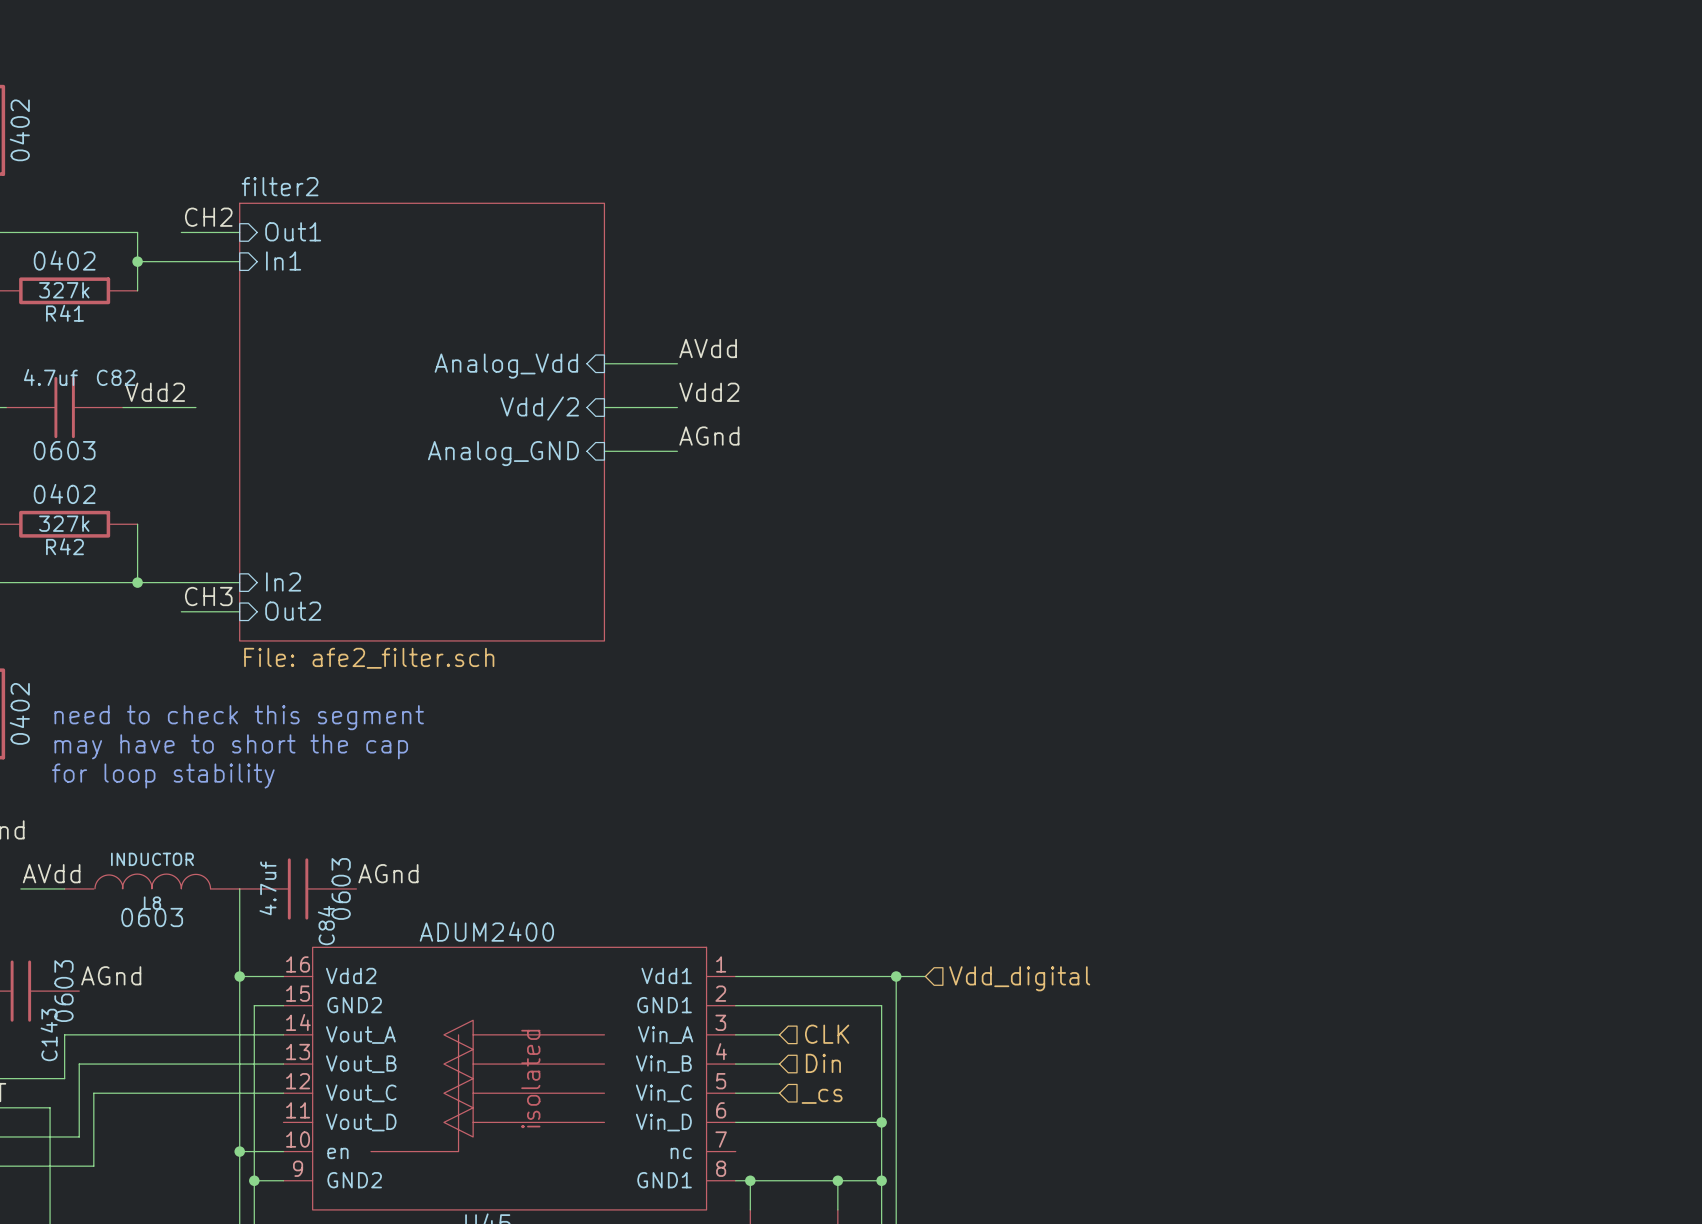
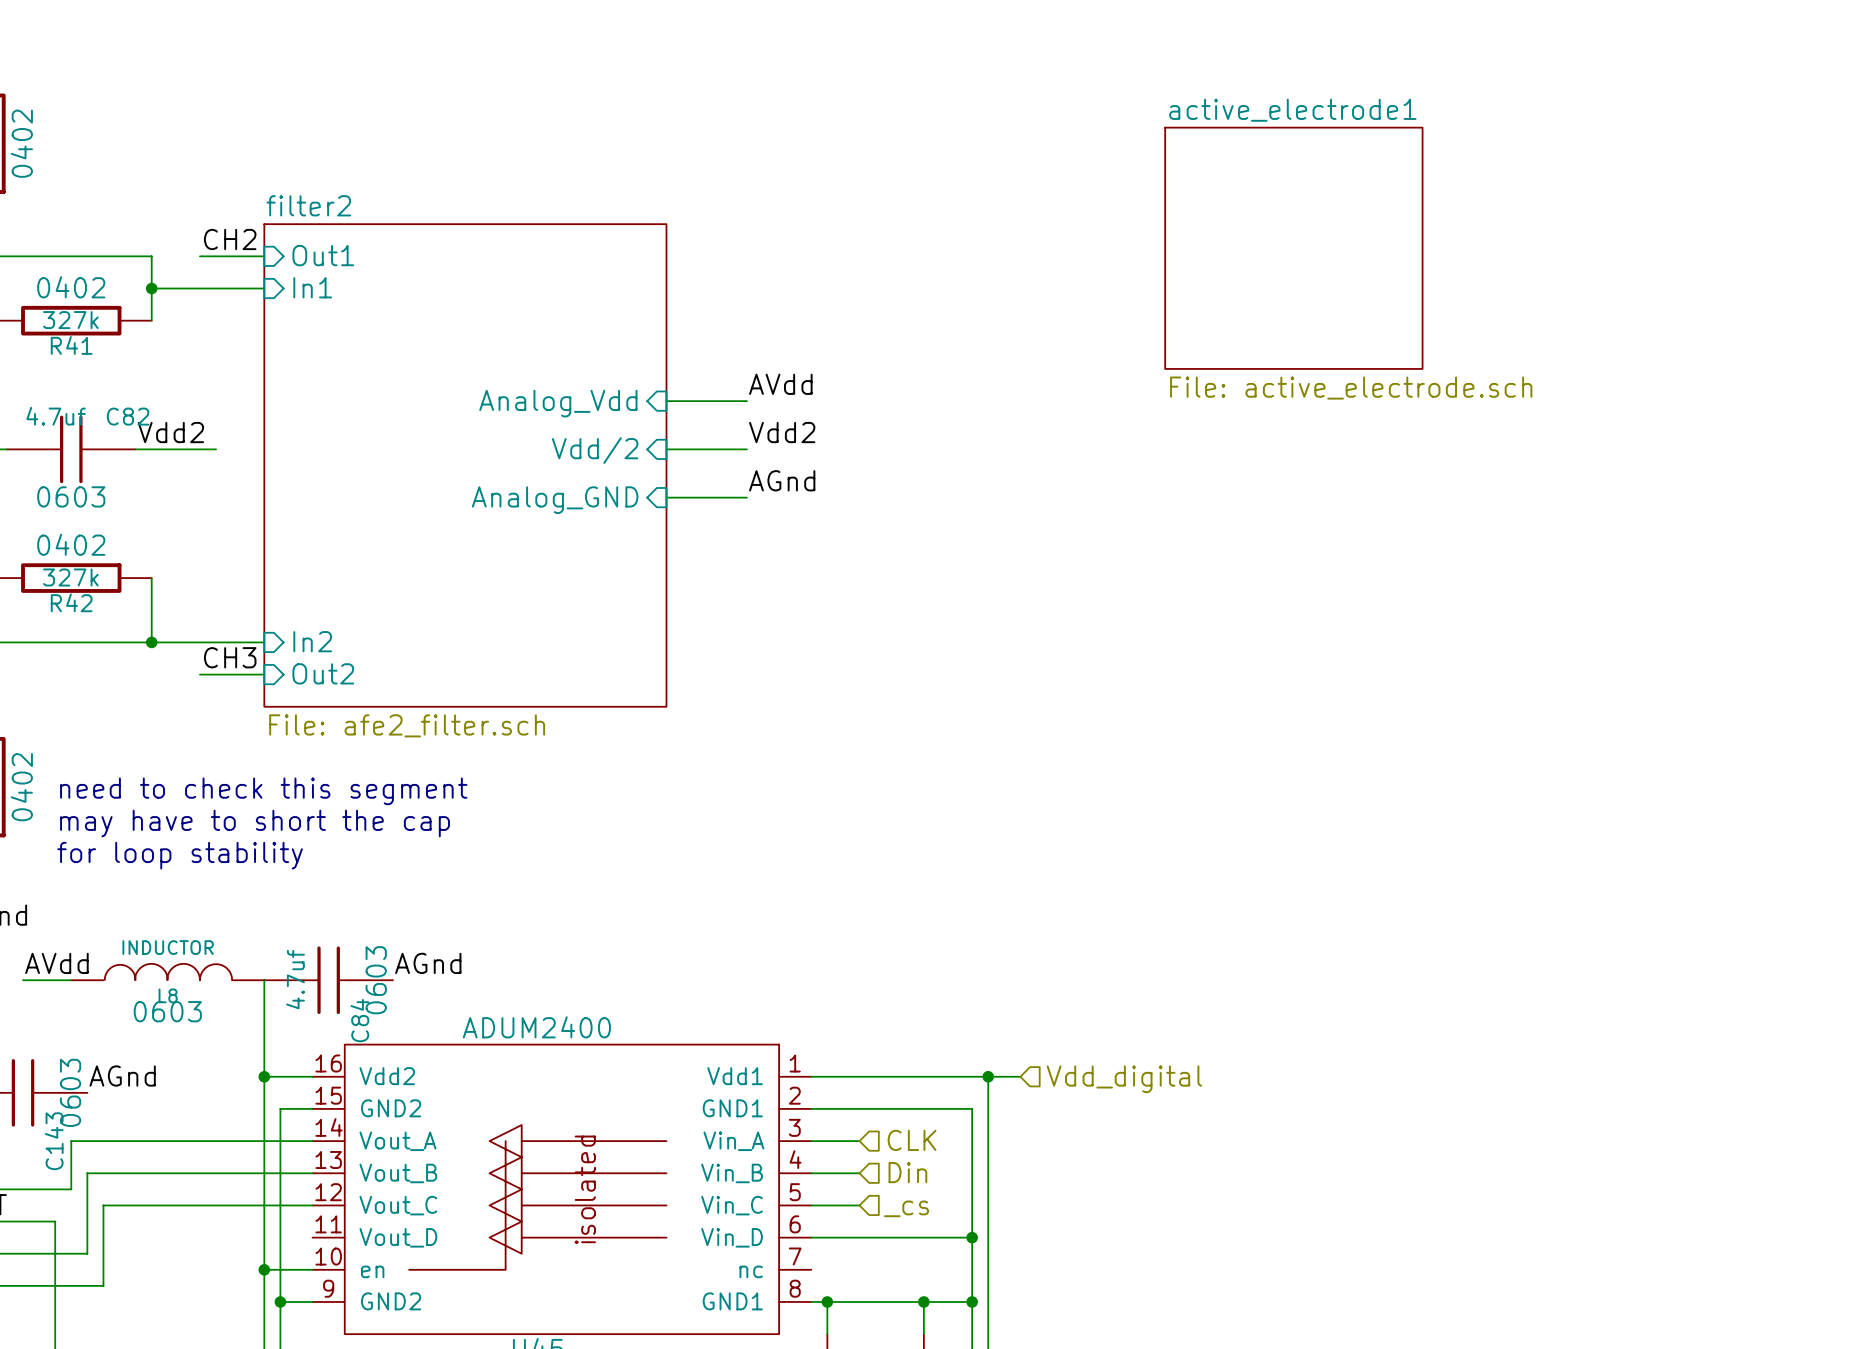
sheet active_electrode1: none -> File: active_electrode.sch (1293, 248)

